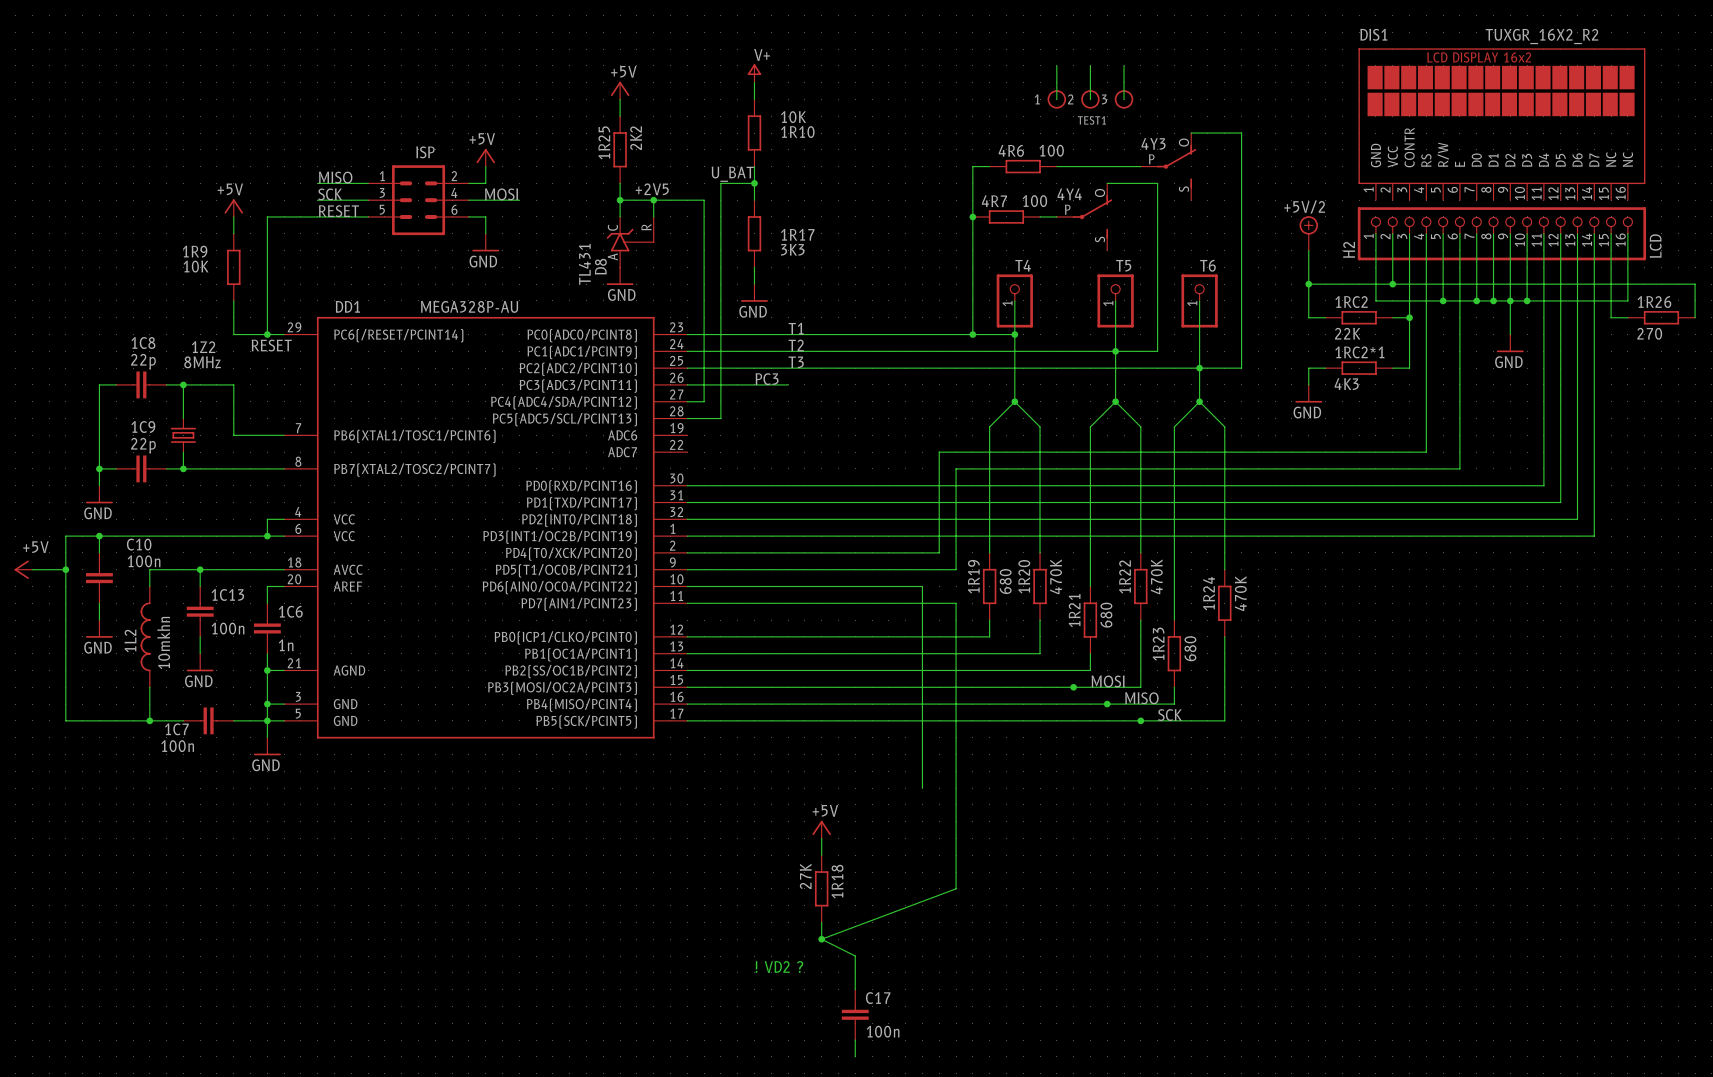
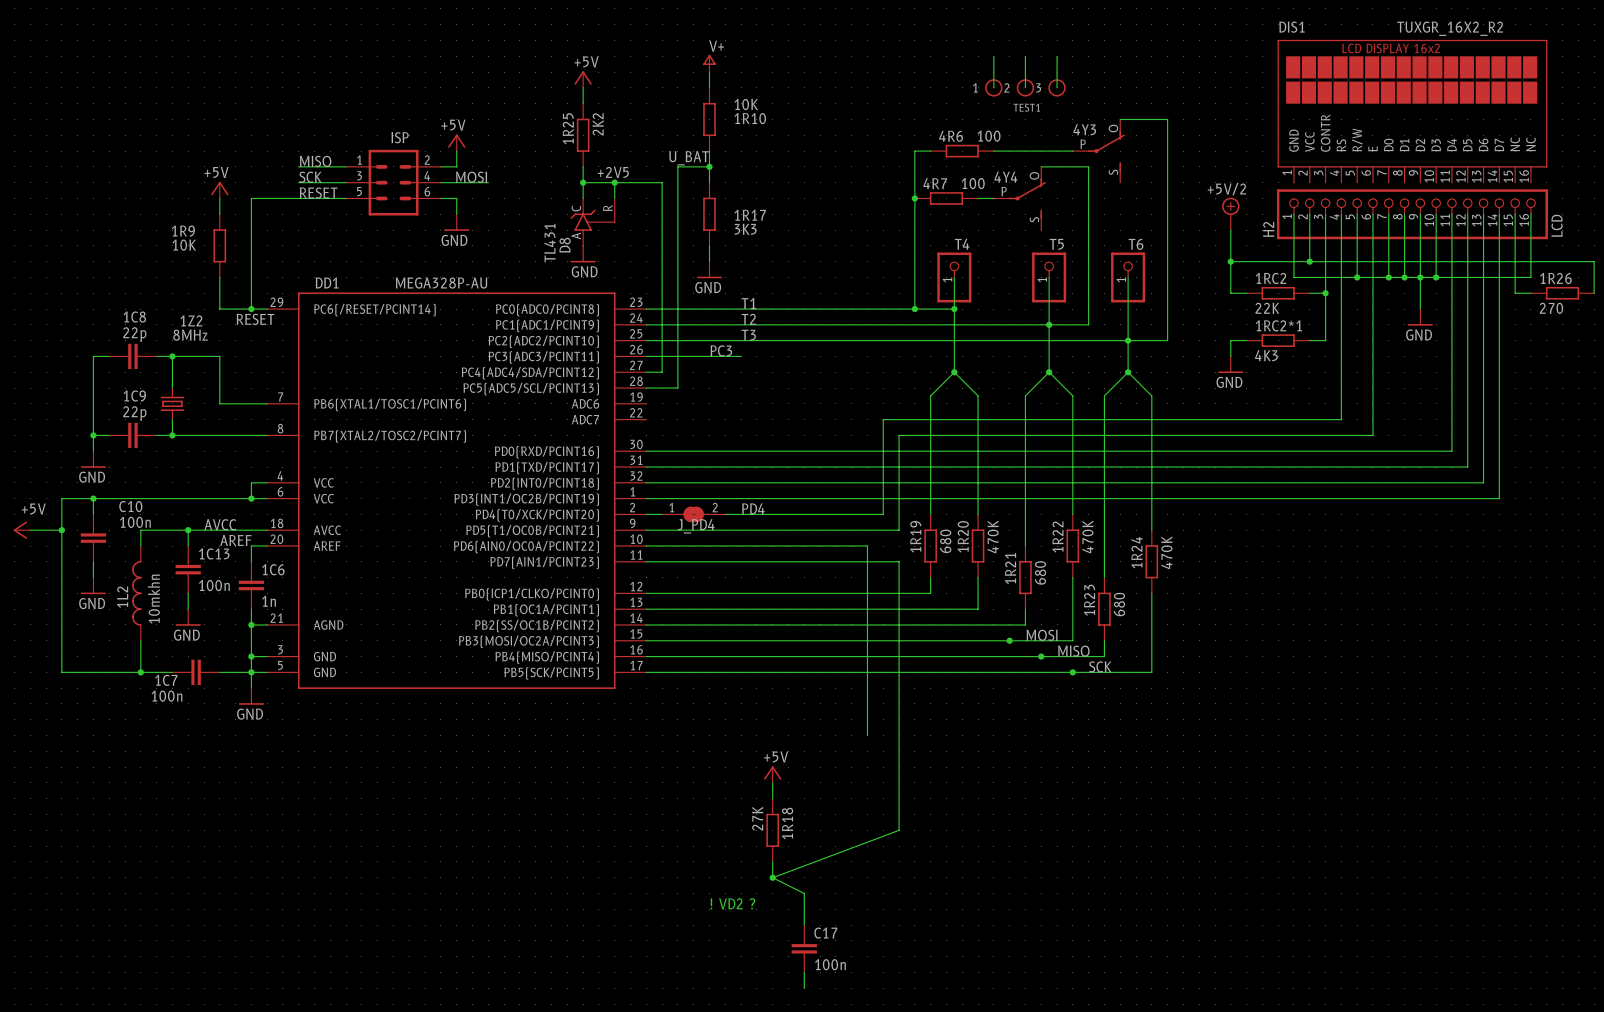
label: none -> PD4 (753, 508)
J_PD4: none -> (693, 514)
label: none -> AVCC (220, 524)
label: none -> AREF (235, 540)

